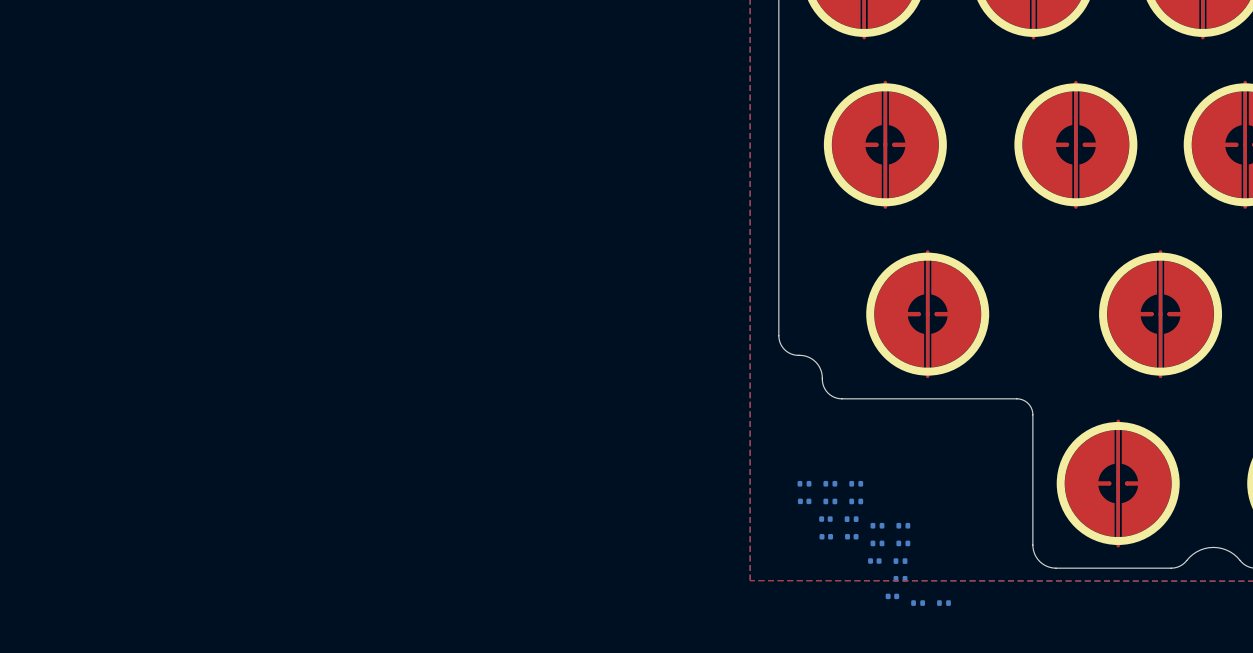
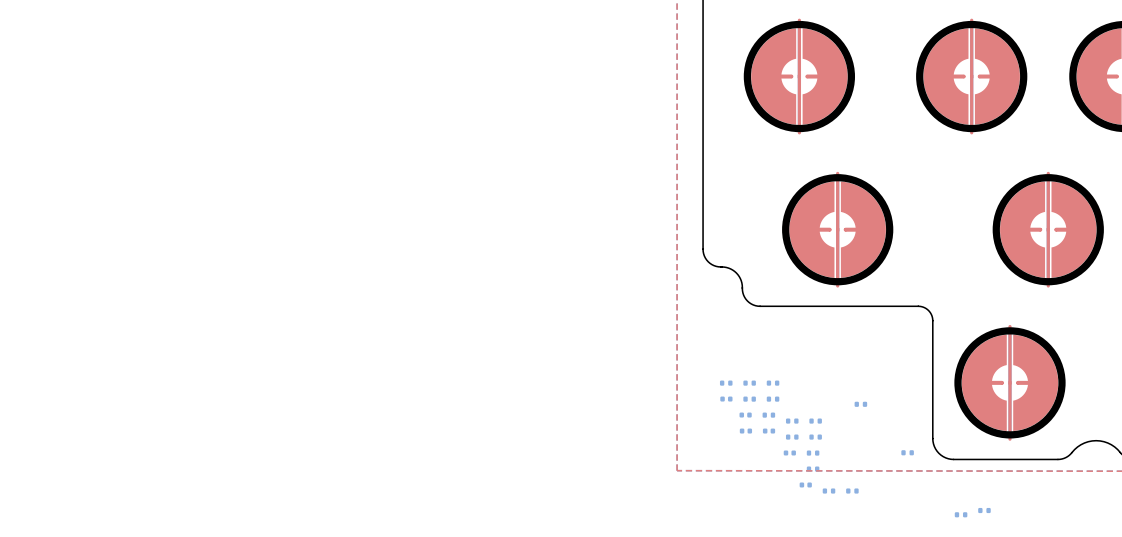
part: none -> (860, 404)
part: none -> (907, 452)
part: none -> (984, 510)
part: none -> (961, 514)

